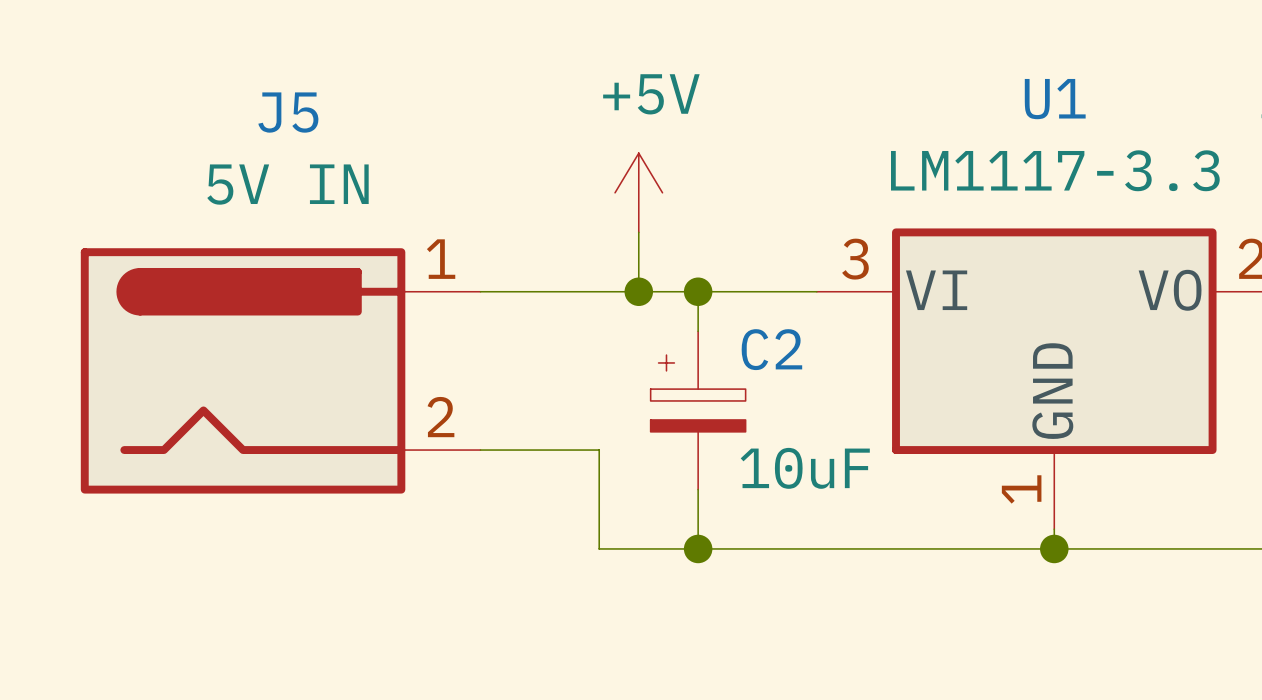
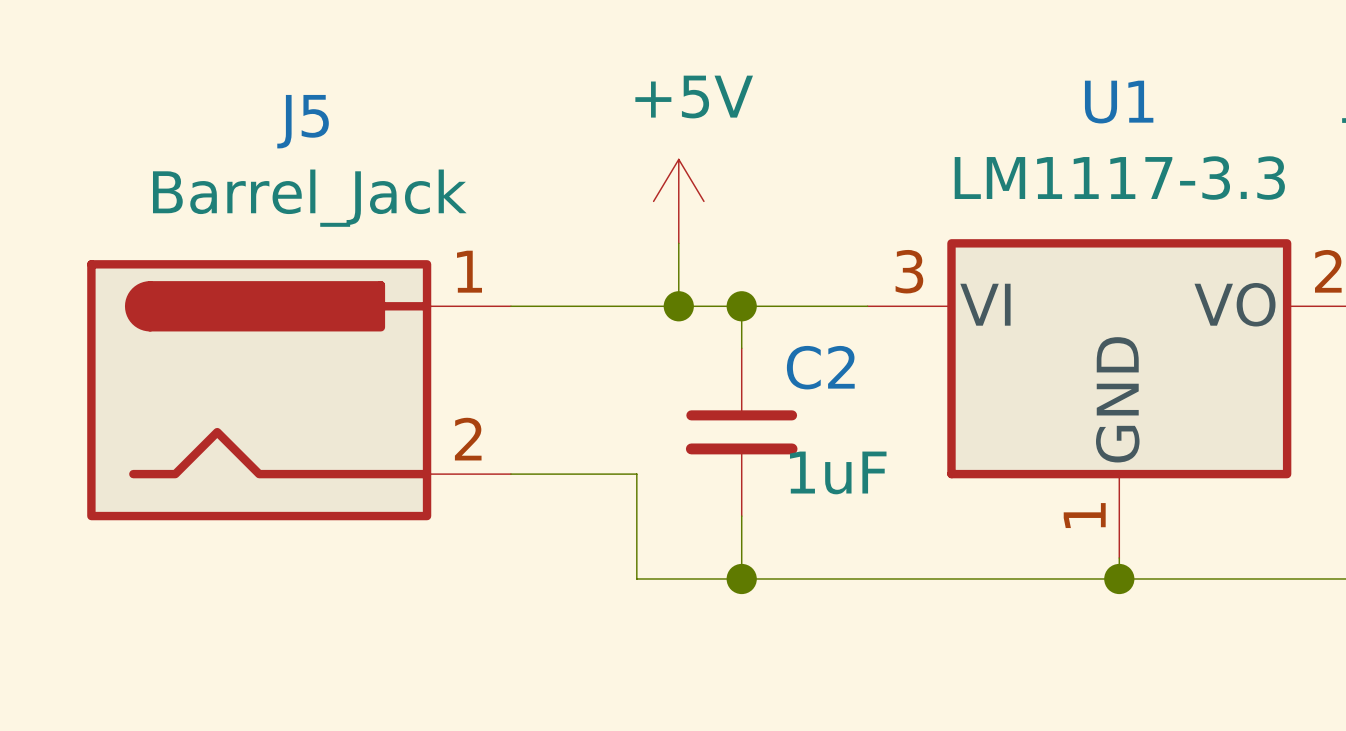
J5 value: 5V IN (287, 184) -> Barrel_Jack (309, 198)
C2 symbol: [650, 331, 746, 490] -> [685, 348, 798, 517]
C2 value: 10uF (805, 468) -> 1uF (838, 472)

